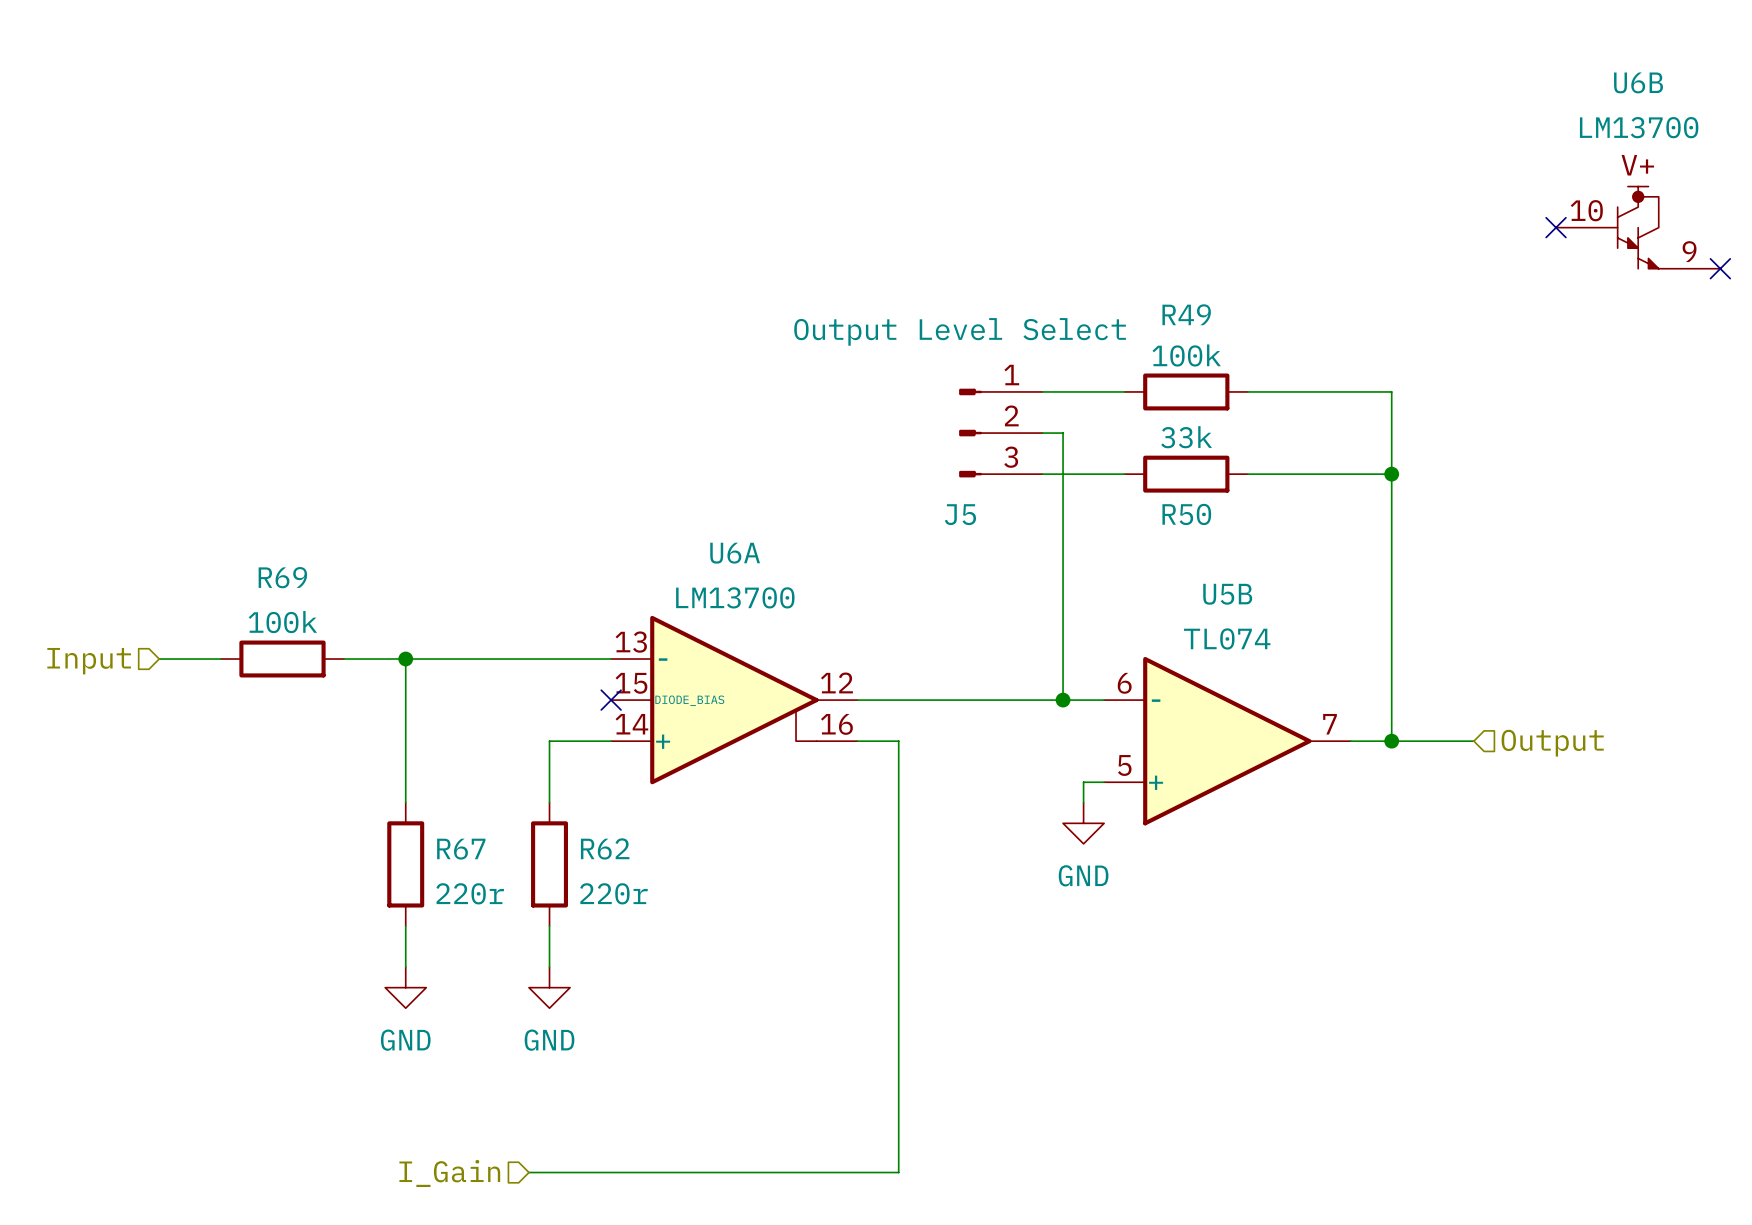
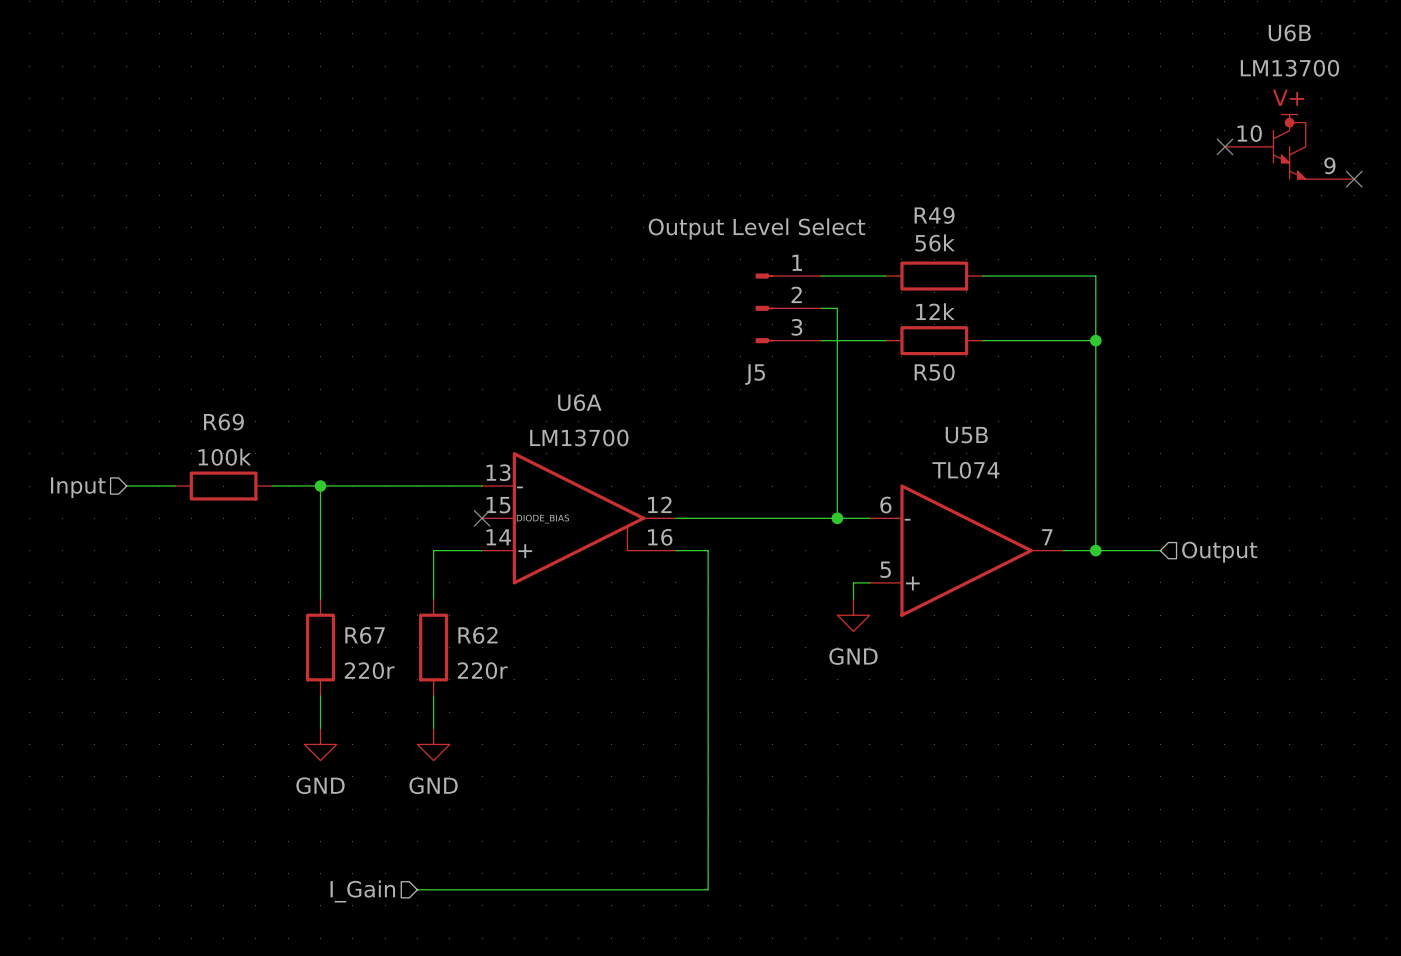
R49 value: 100k (1186, 355) -> 56k (935, 242)
R50 value: 33k (1186, 437) -> 12k (935, 311)

